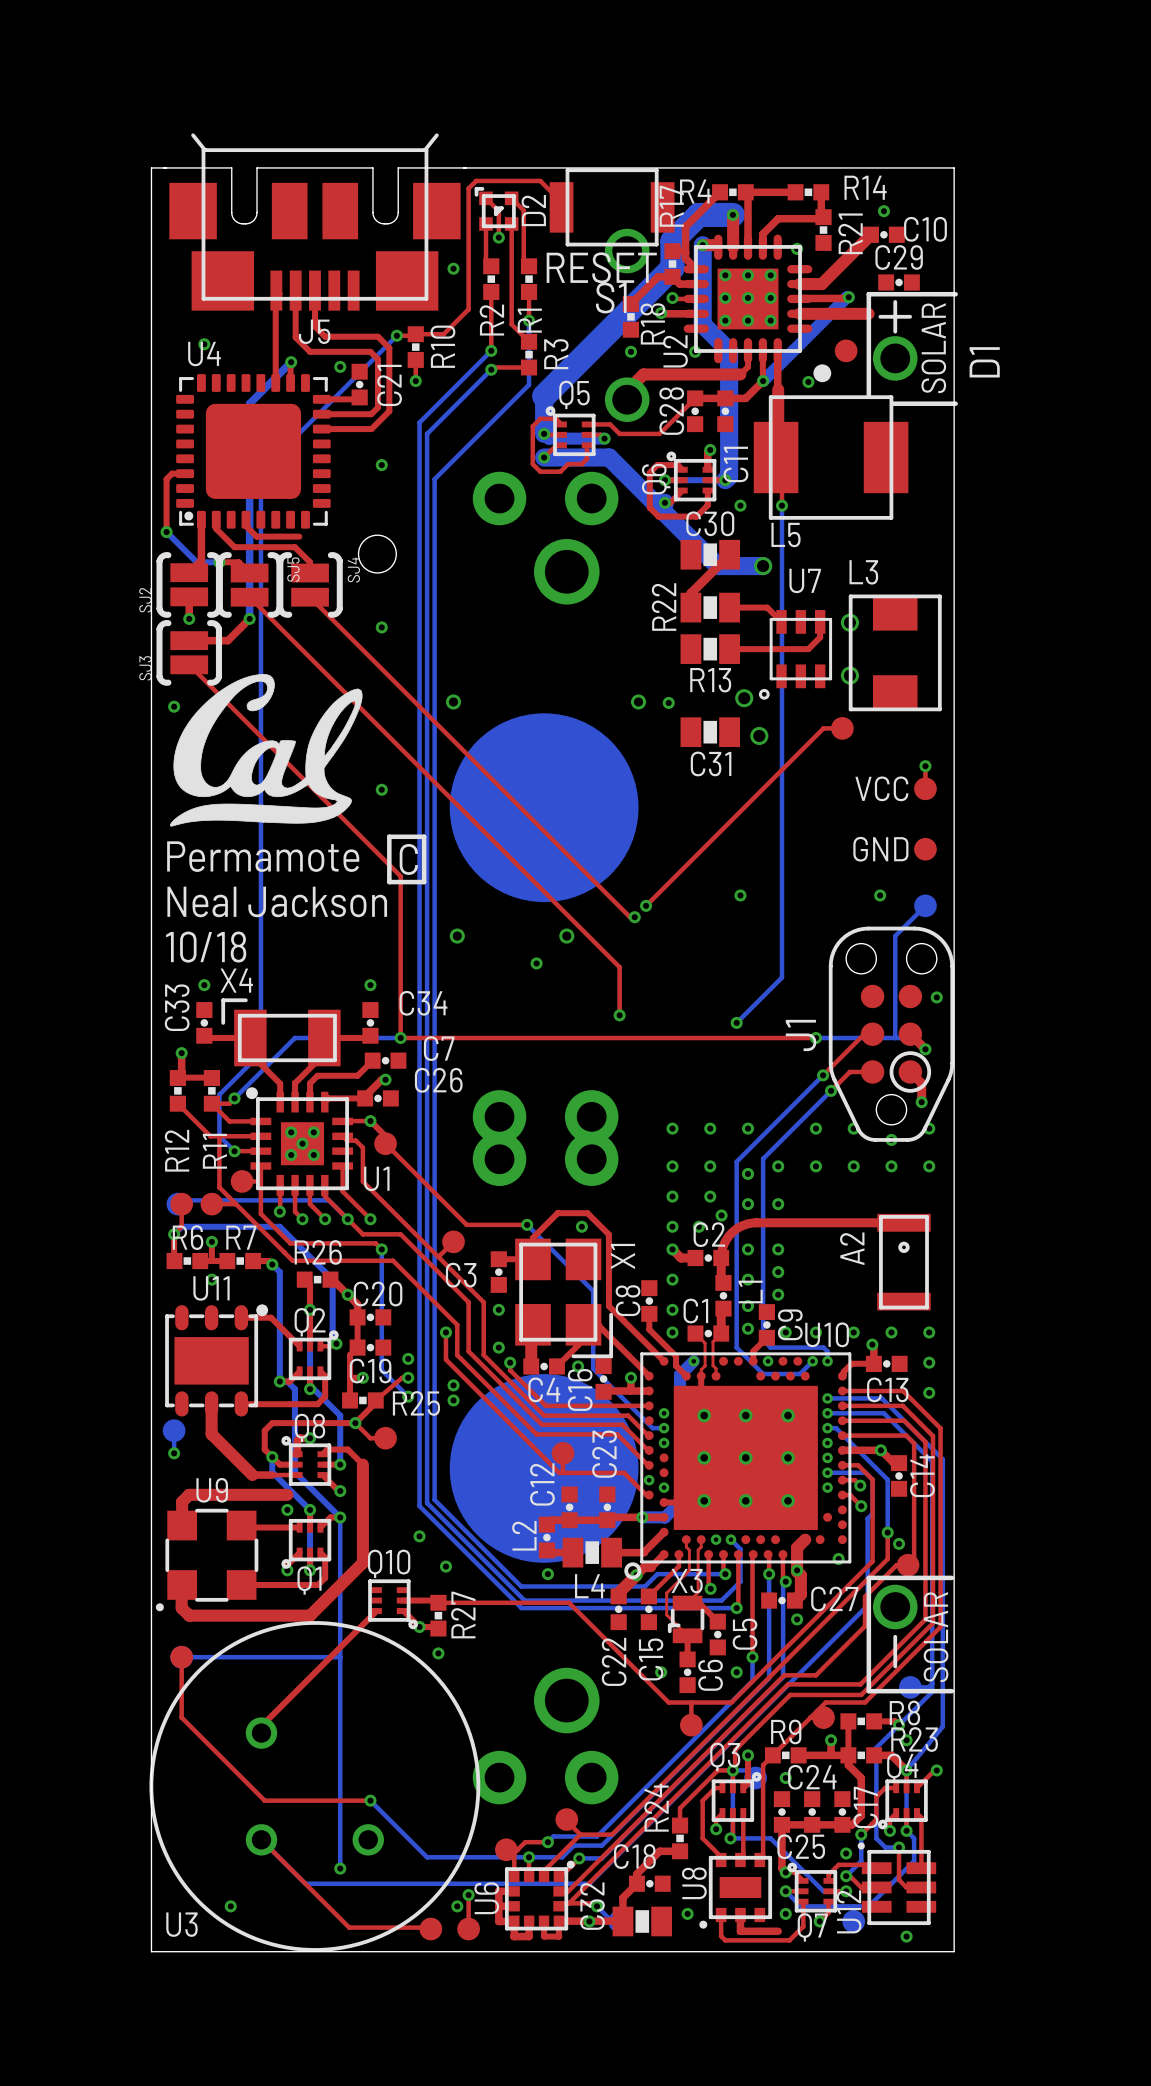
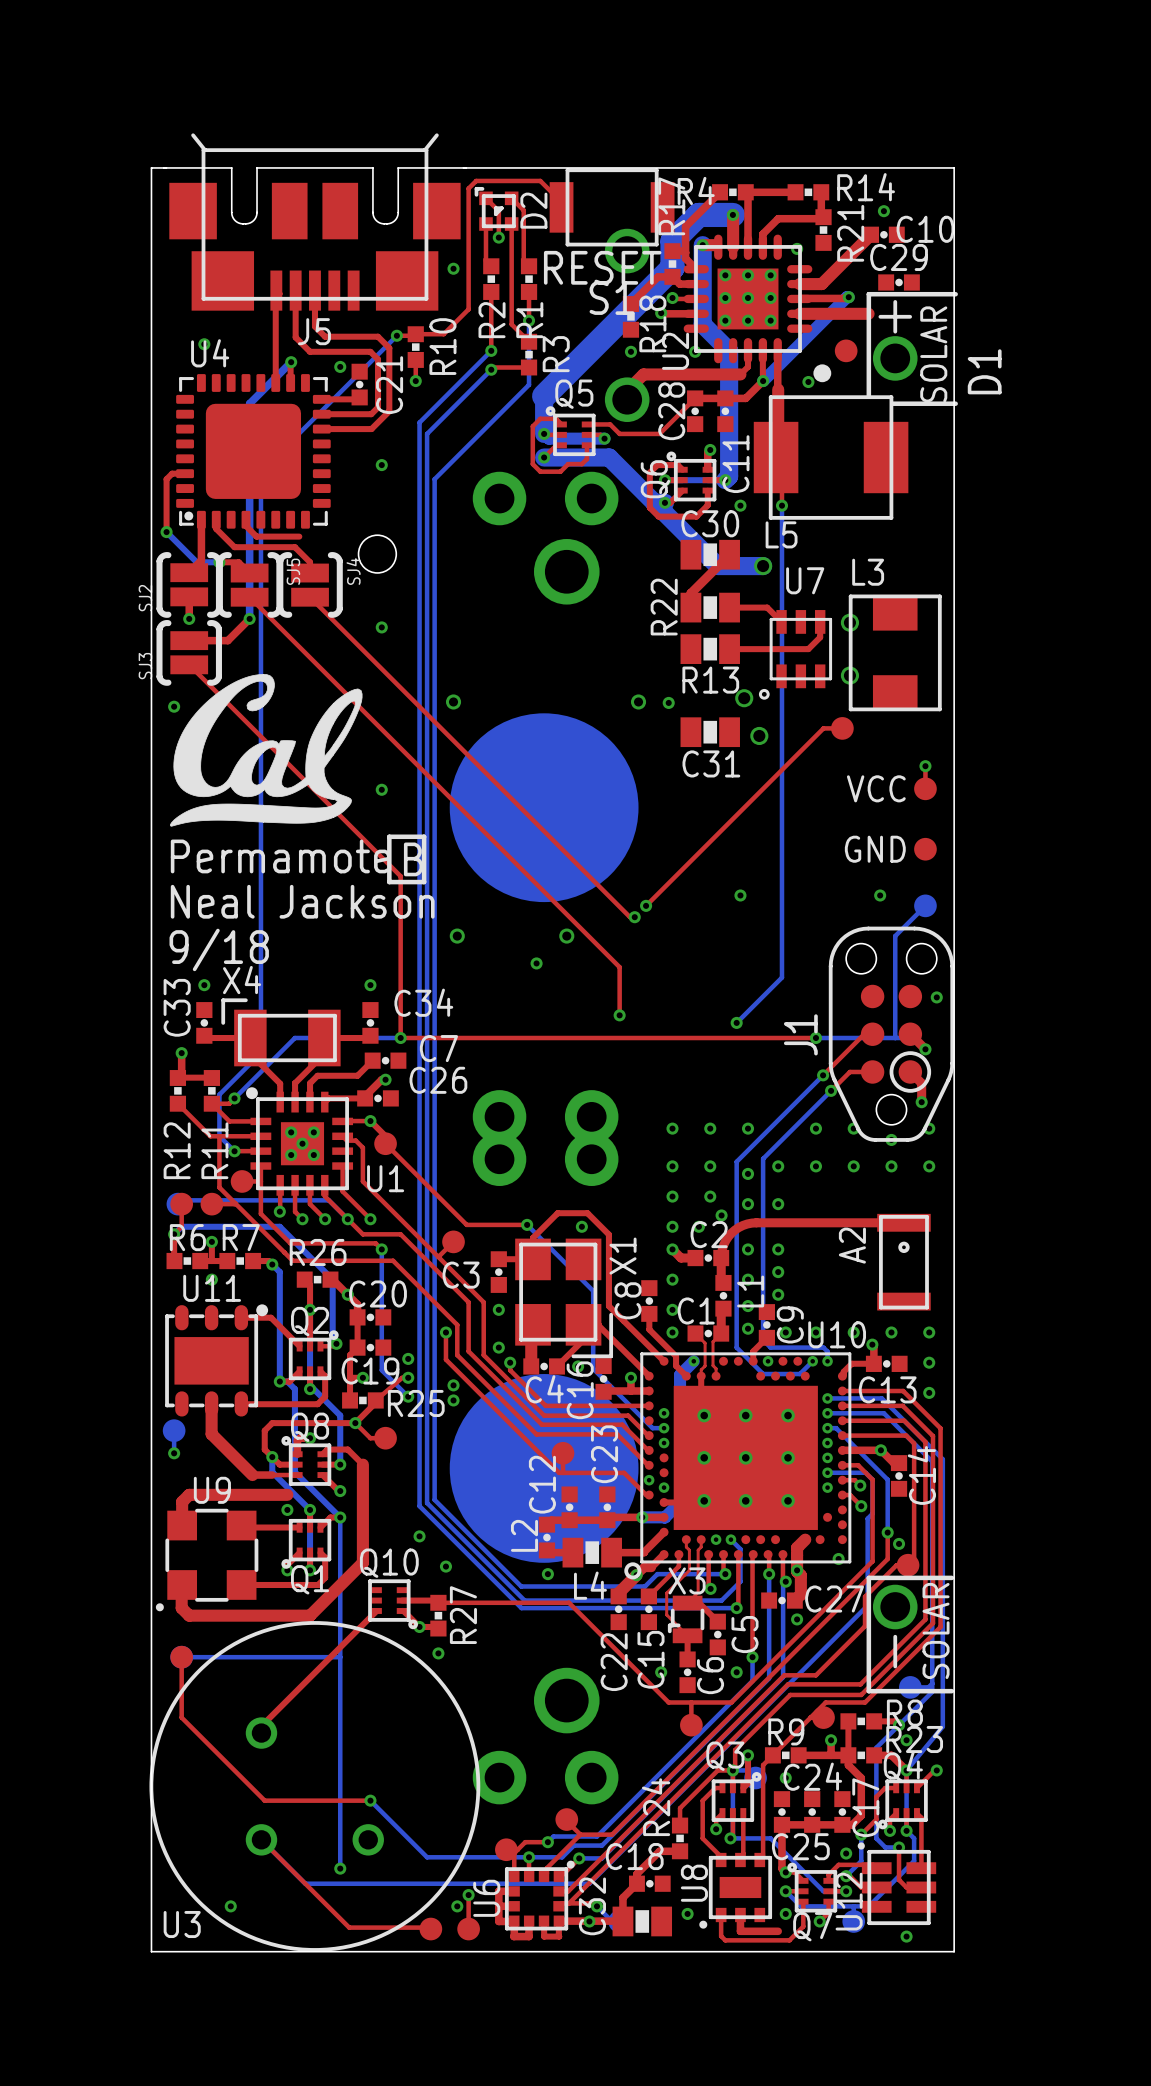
text: C (408, 859) -> B (413, 859)
text: 10/18 (206, 947) -> 9/18 (219, 949)

